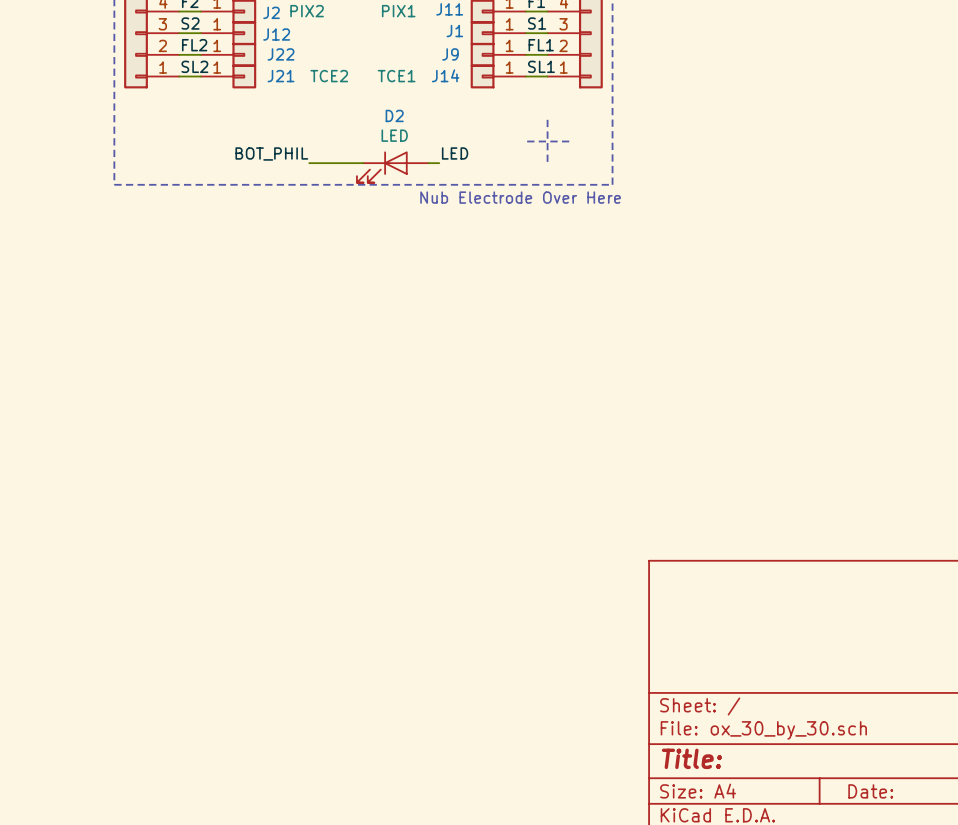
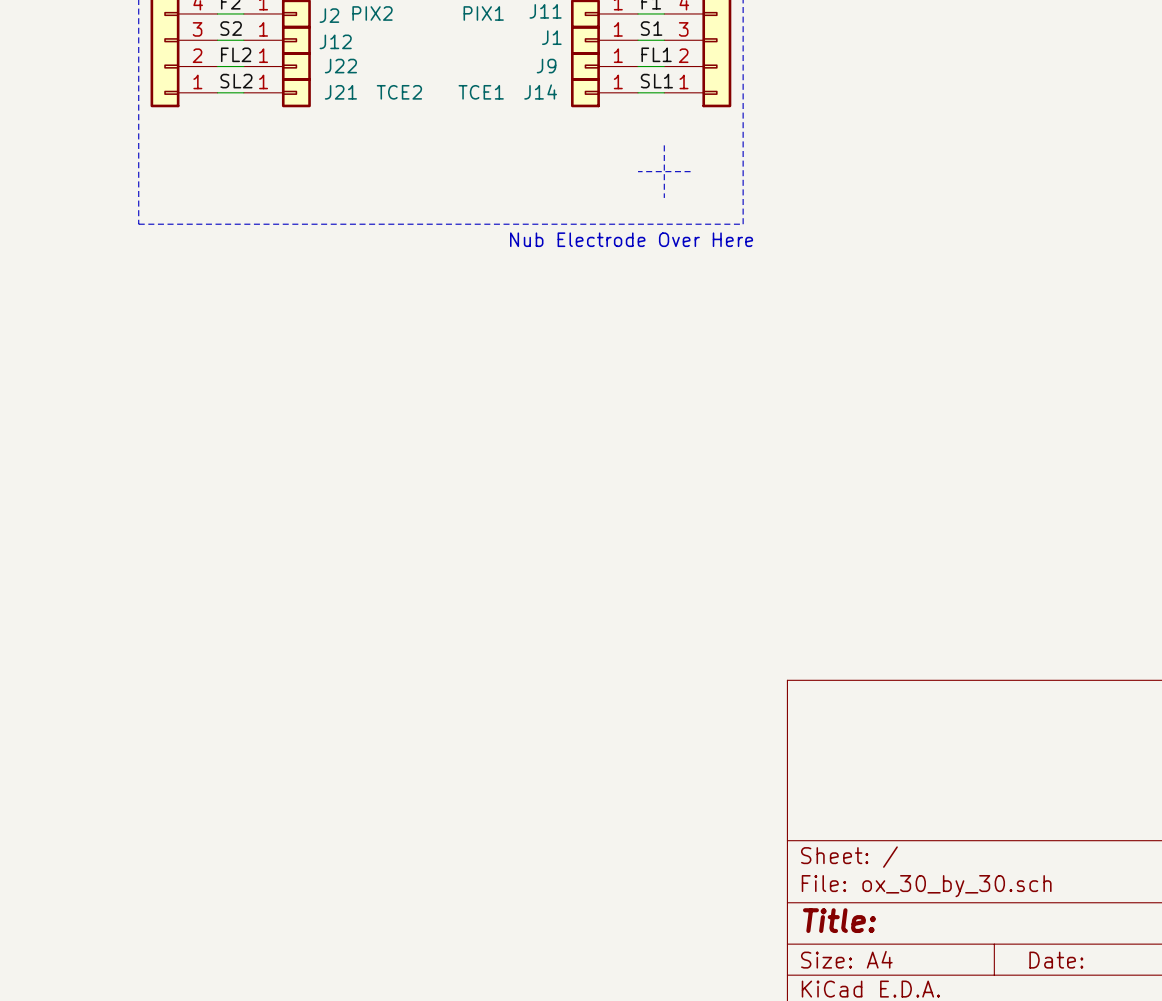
label: LED (455, 153) -> none
label: BOT_PHIL (271, 154) -> none
wire: (309, 163) (363, 163) -> none
wire: (428, 163) (439, 163) -> none
D2: LED (392, 167) -> none

